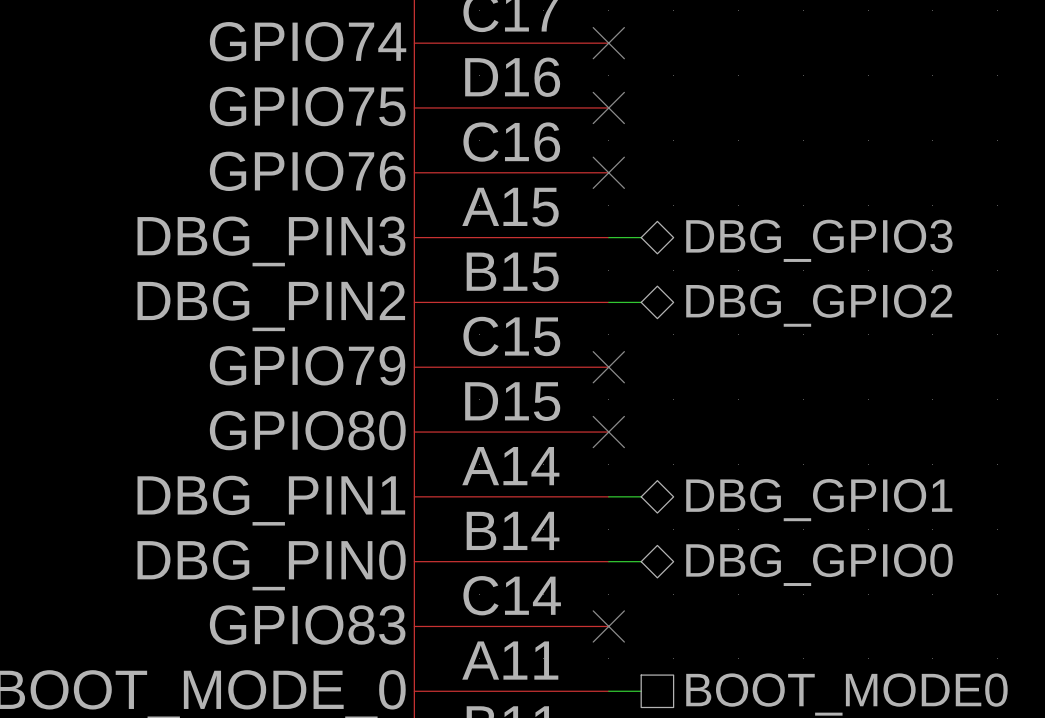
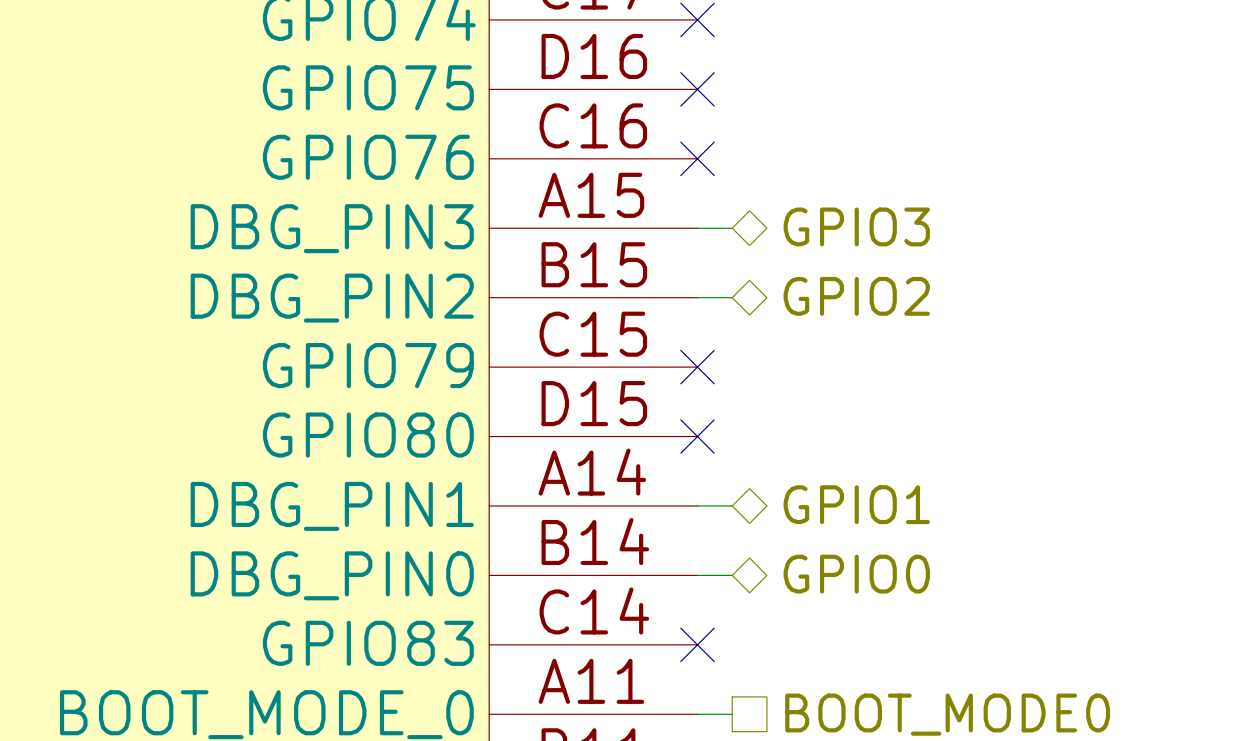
hierarchical label: DBG_GPIO3 (819, 240) -> GPIO3 (856, 226)
hierarchical label: DBG_GPIO2 (819, 305) -> GPIO2 (856, 296)
hierarchical label: DBG_GPIO1 (819, 500) -> GPIO1 (856, 504)
hierarchical label: DBG_GPIO0 (819, 564) -> GPIO0 (856, 574)

